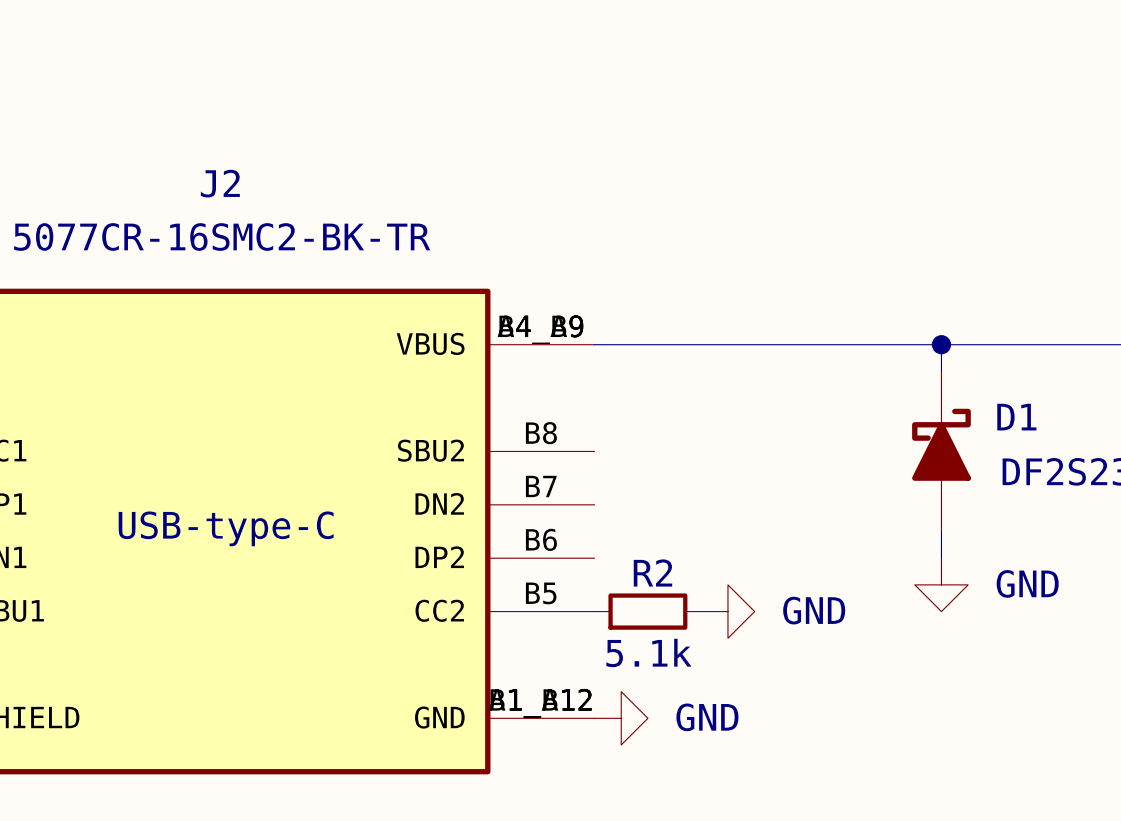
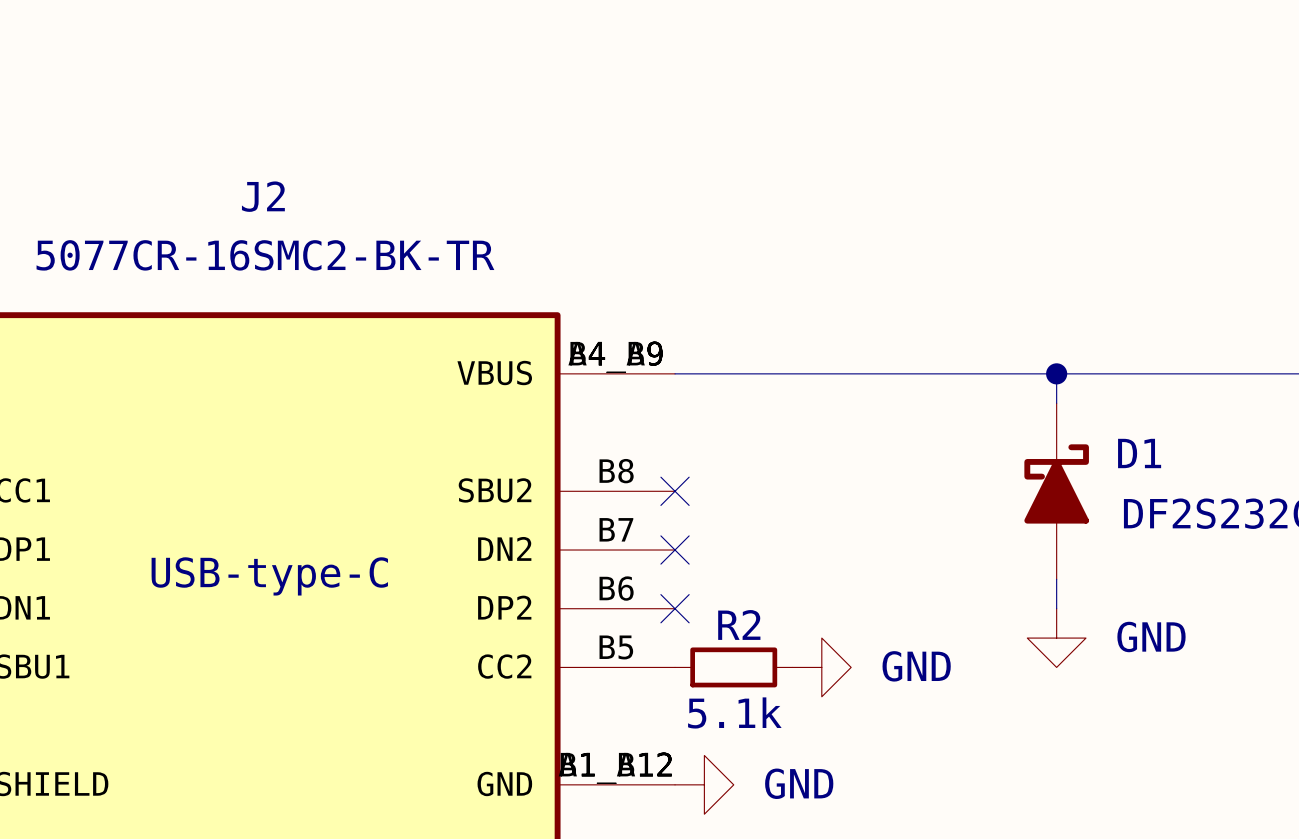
no-connect mark: none -> (675, 491)
no-connect mark: none -> (675, 550)
no-connect mark: none -> (675, 608)

